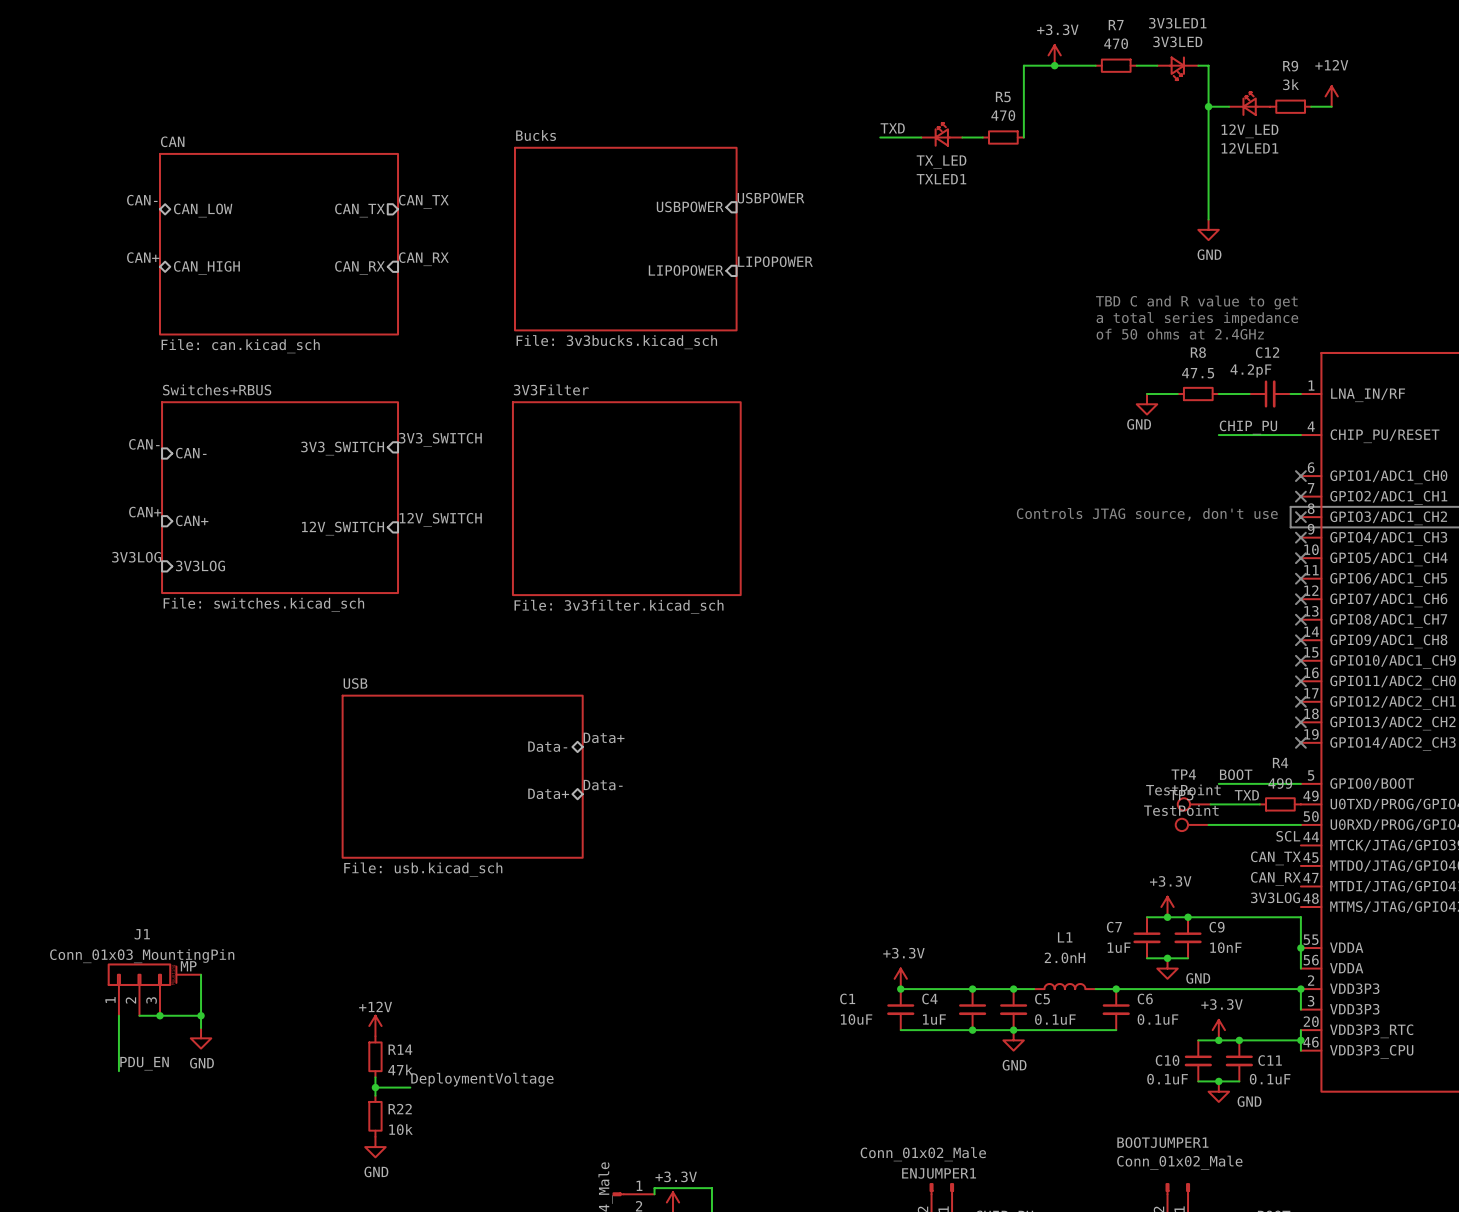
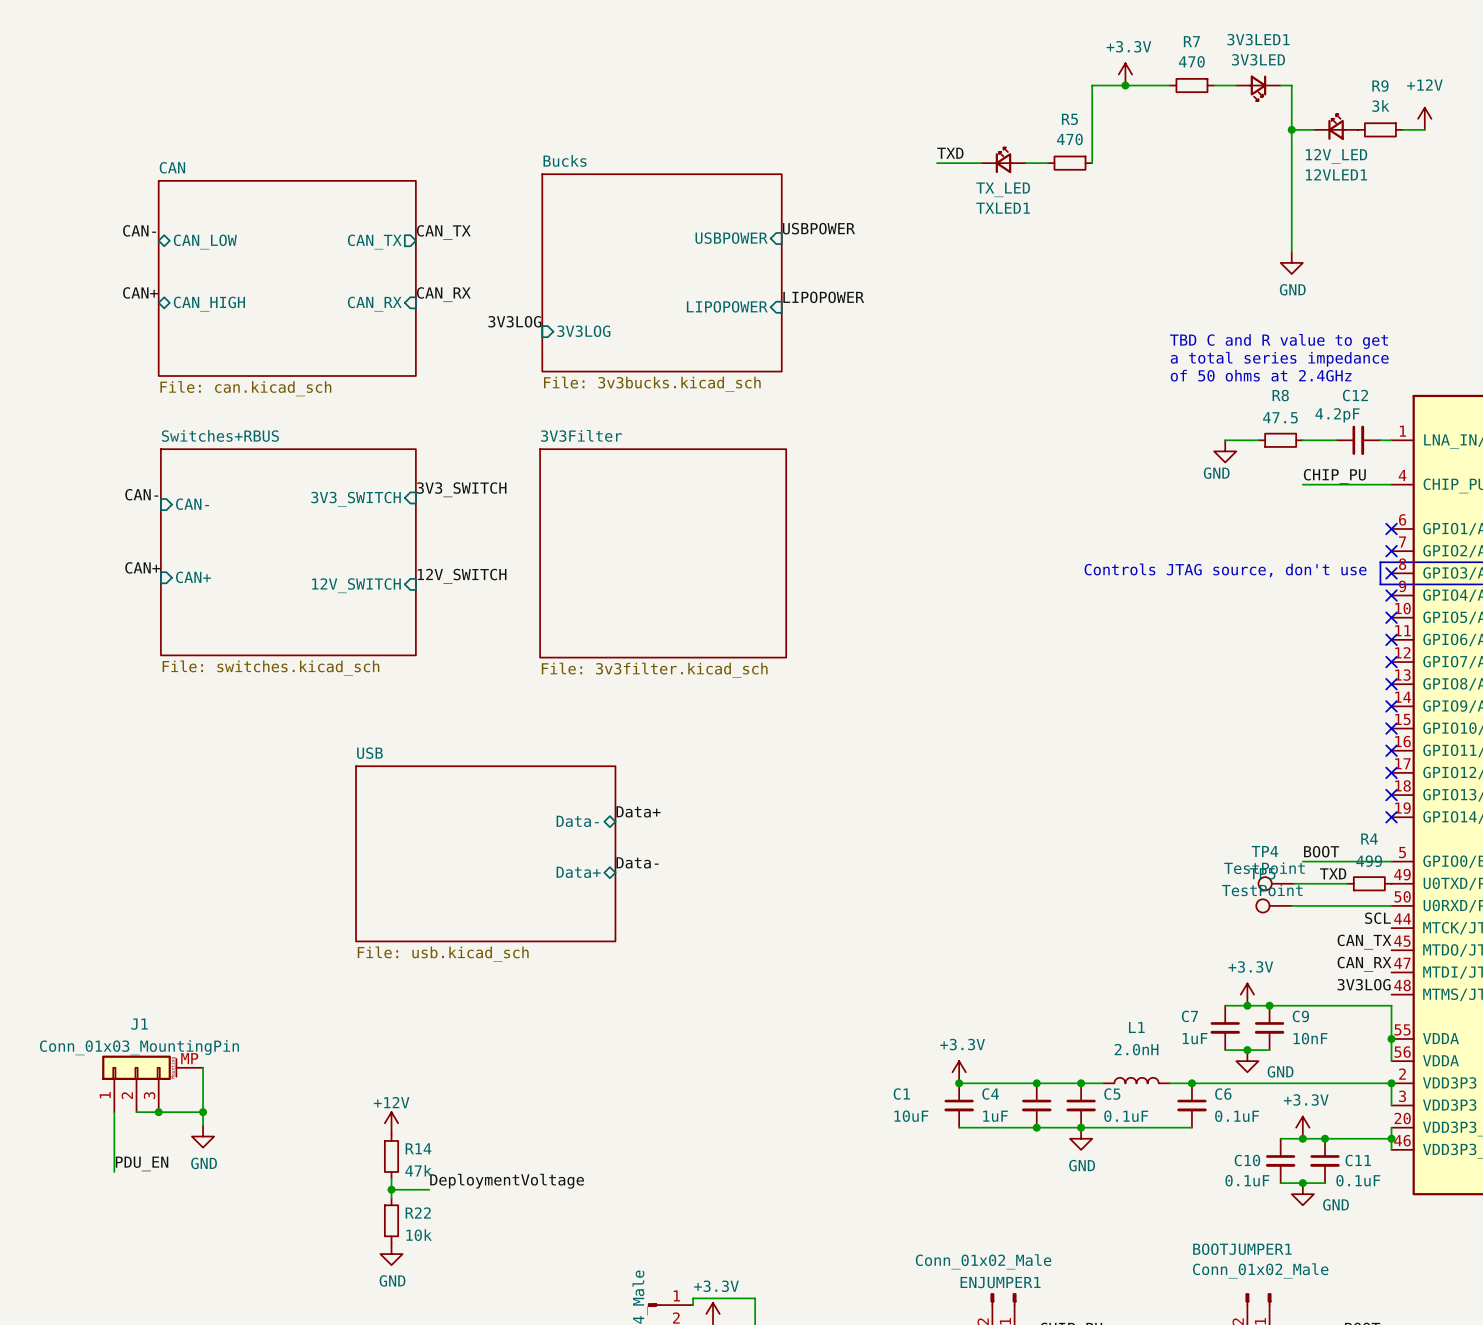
label: none -> 3V3LOG (514, 321)
sheet pin: none -> 3V3LOG (583, 331)
label: 3V3LOG (136, 557) -> none
sheet pin: 3V3LOG (200, 566) -> none

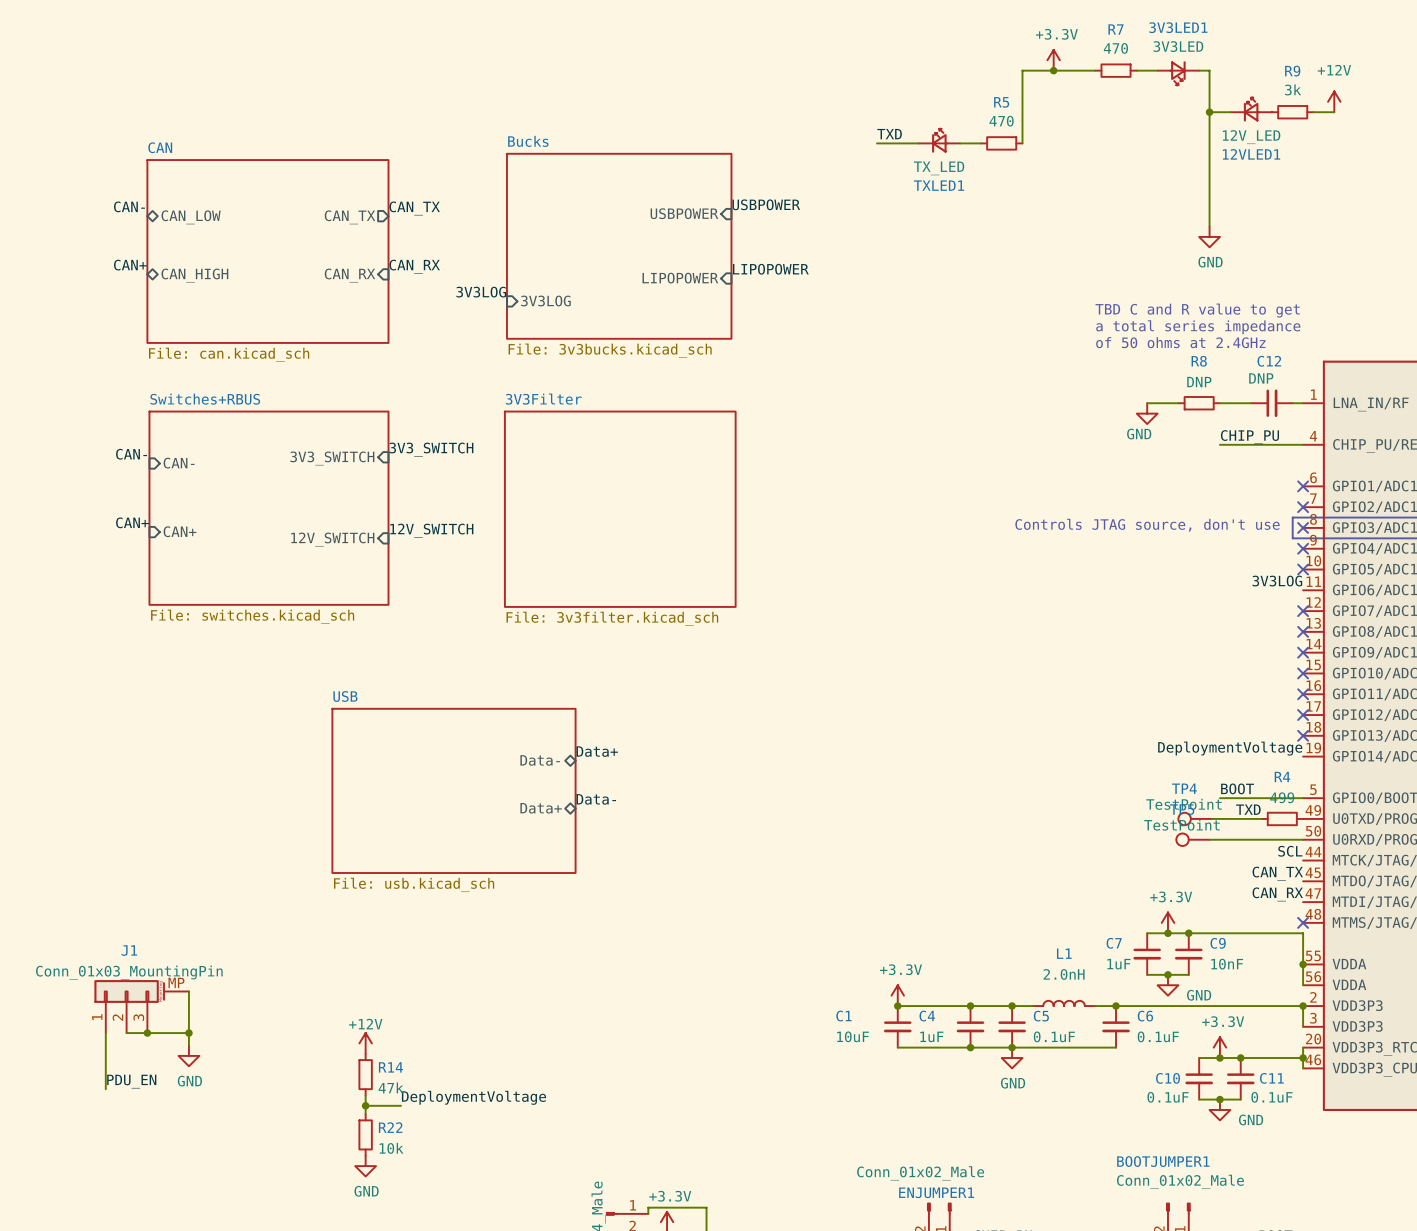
C12 value: 4.2pF (1337, 415) -> DNP (1261, 378)
R8 value: 47.5 (1280, 417) -> DNP (1199, 382)
label: none -> 3V3LOG (1277, 581)
no-connect mark: (1391, 639) -> none
label: none -> DeploymentVoltage (1230, 748)
no-connect mark: (1391, 817) -> none
label: 3V3LOG (1364, 984) -> none
no-connect mark: none -> (1303, 922)

